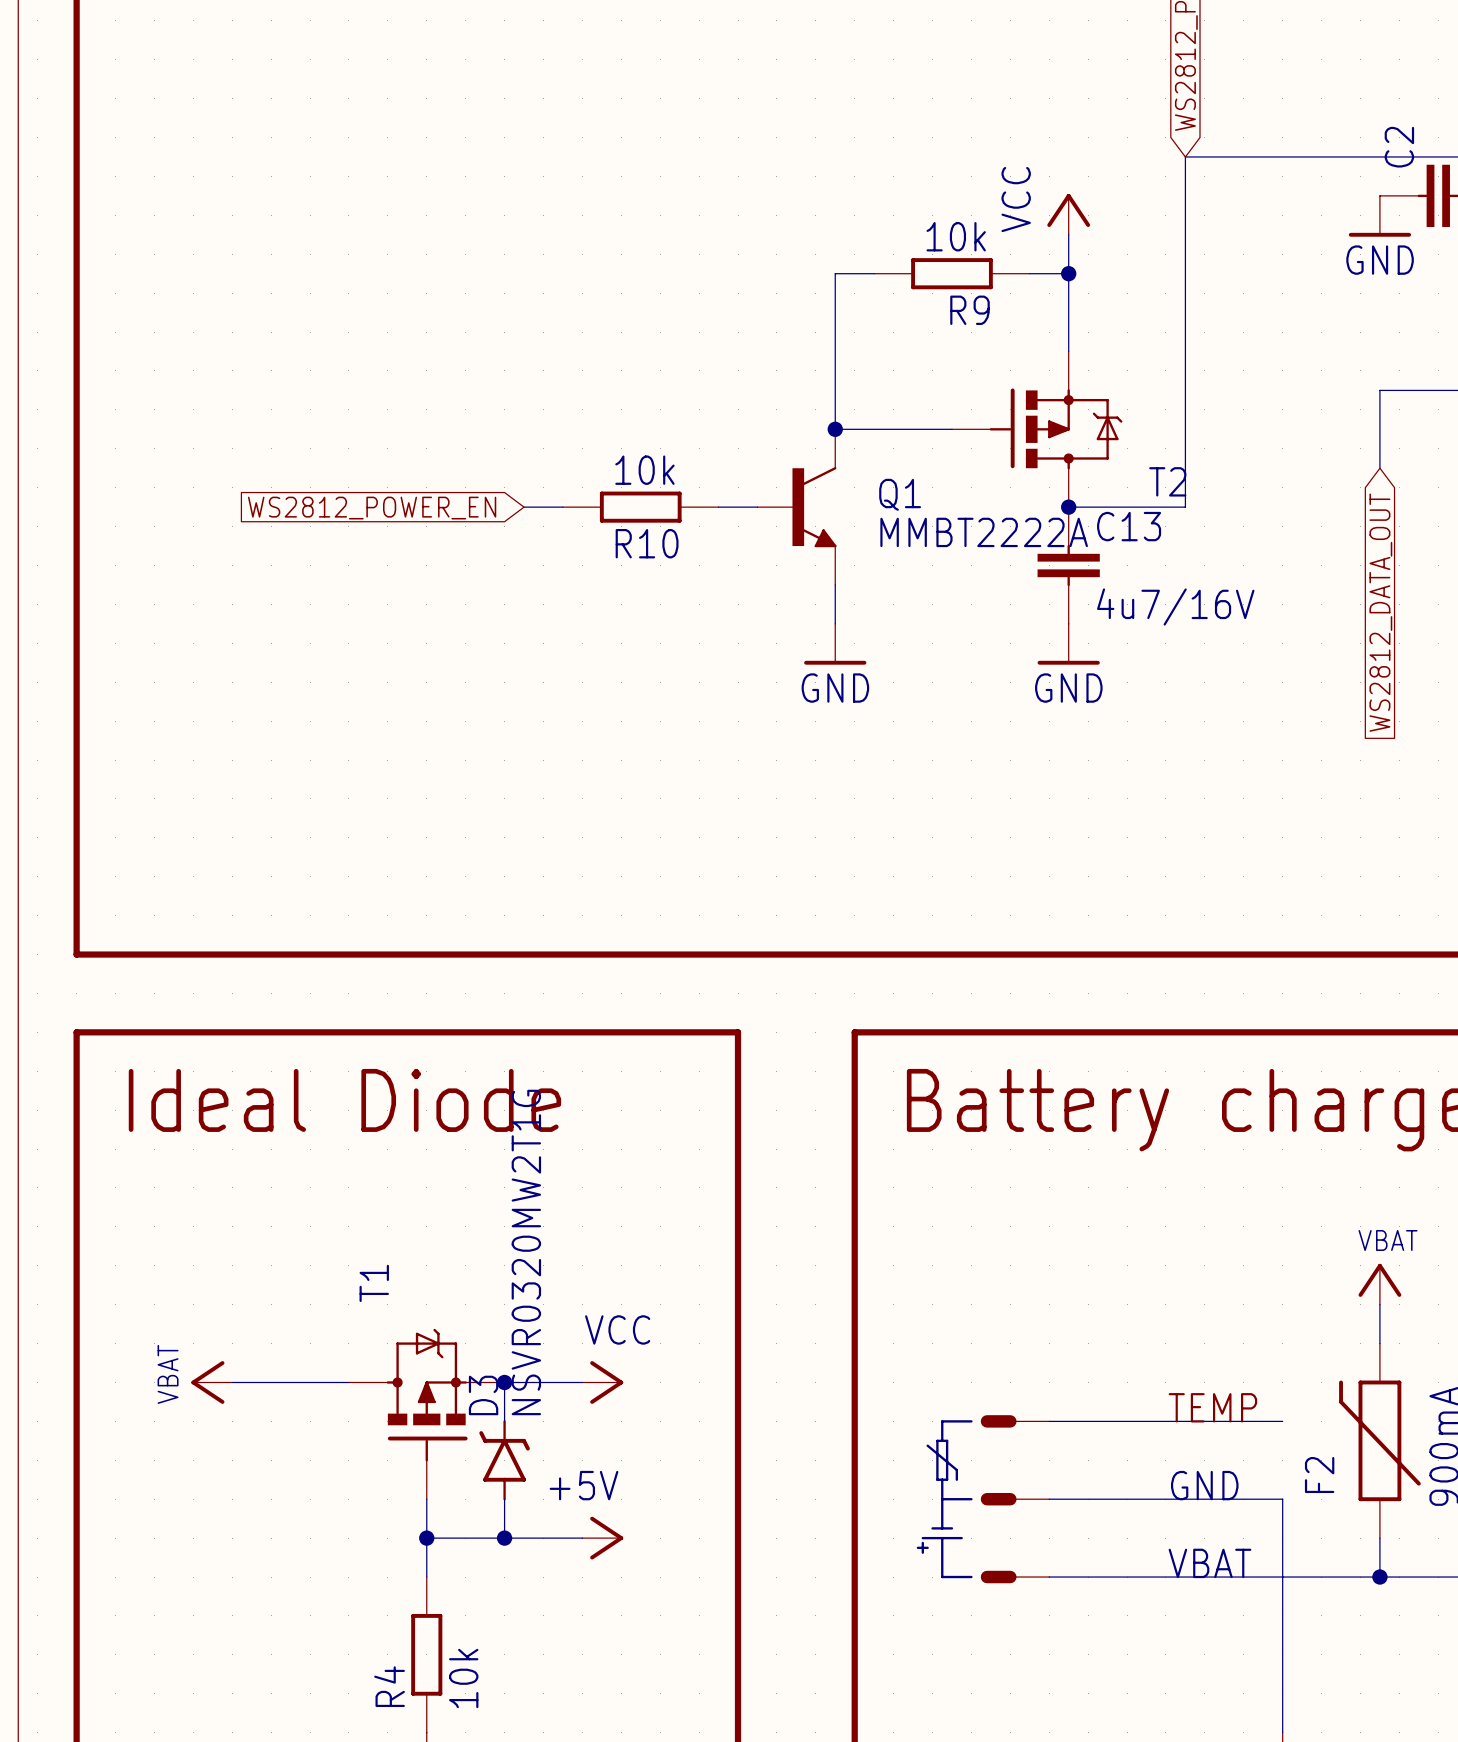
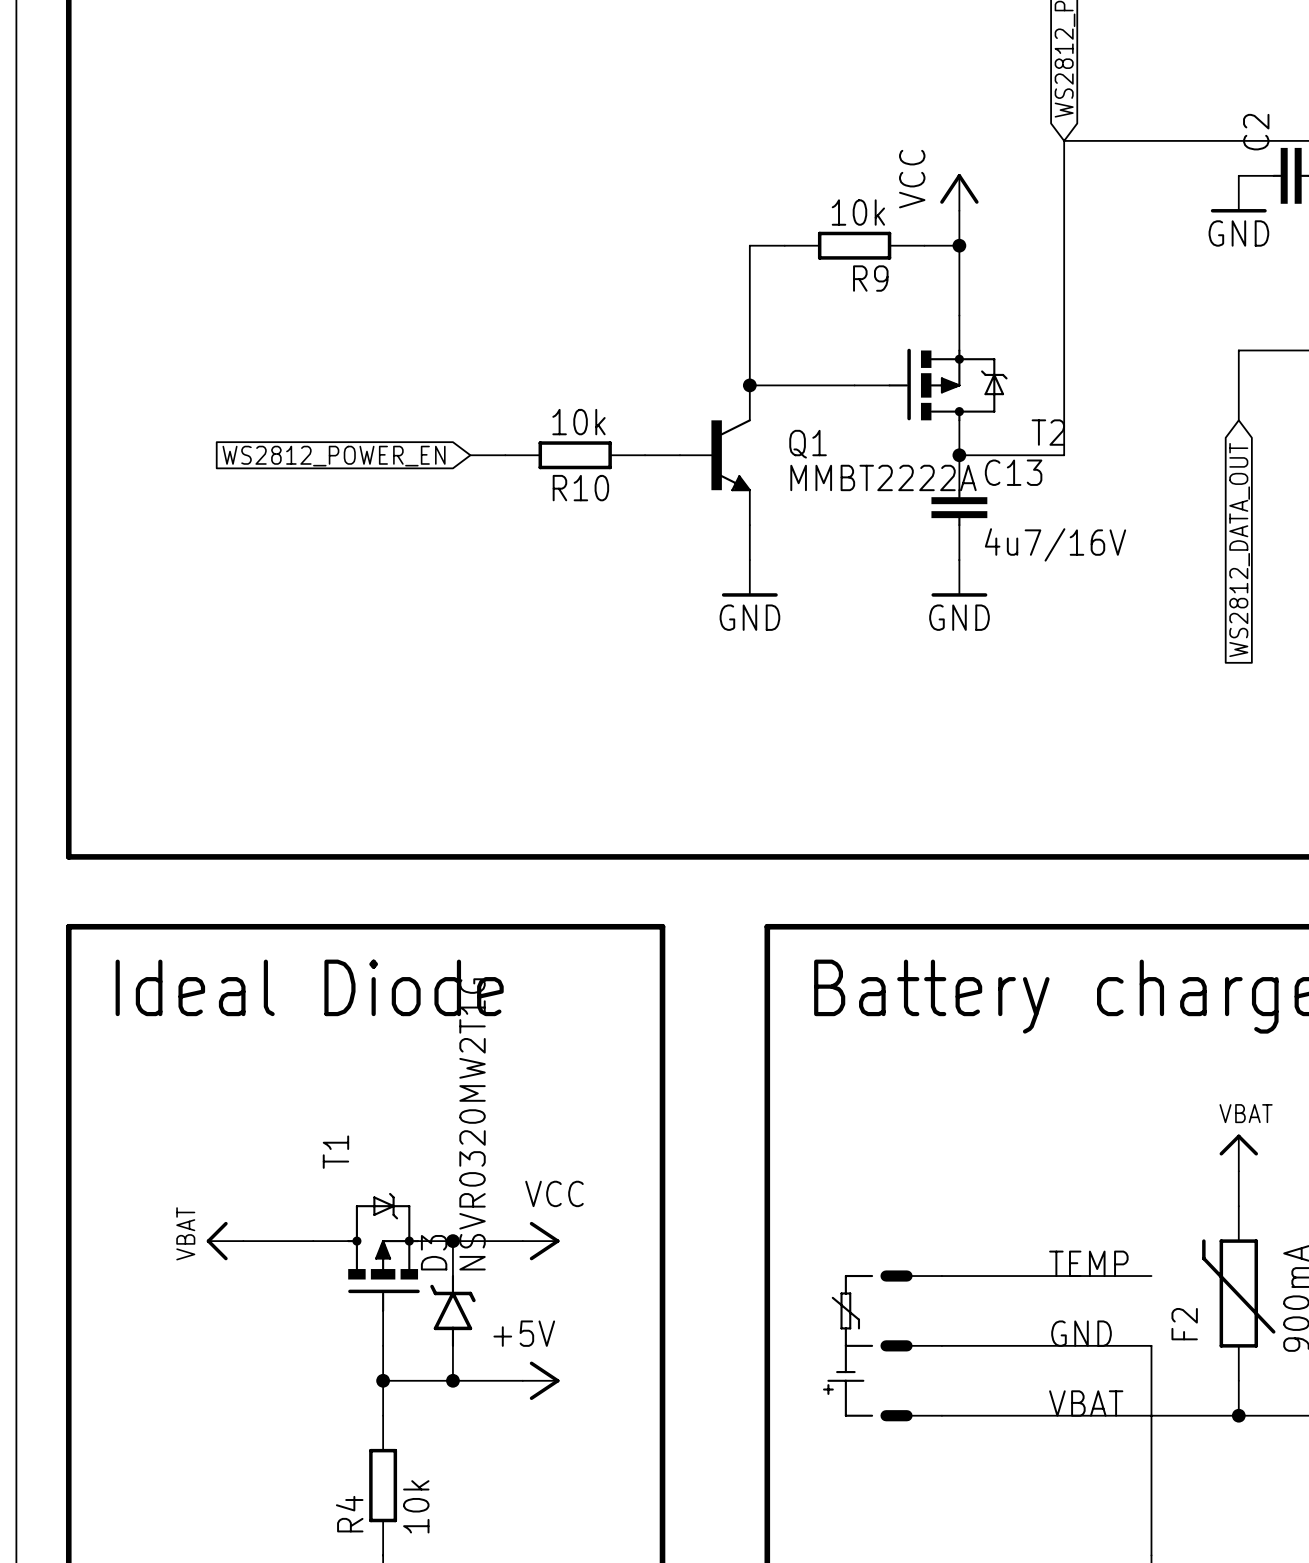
power symbol shape: [1358, 1263, 1402, 1305] -> [1219, 1134, 1259, 1172]
power symbol: VBAT (211, 1382) -> none
power symbol: none -> VBAT (225, 1241)

